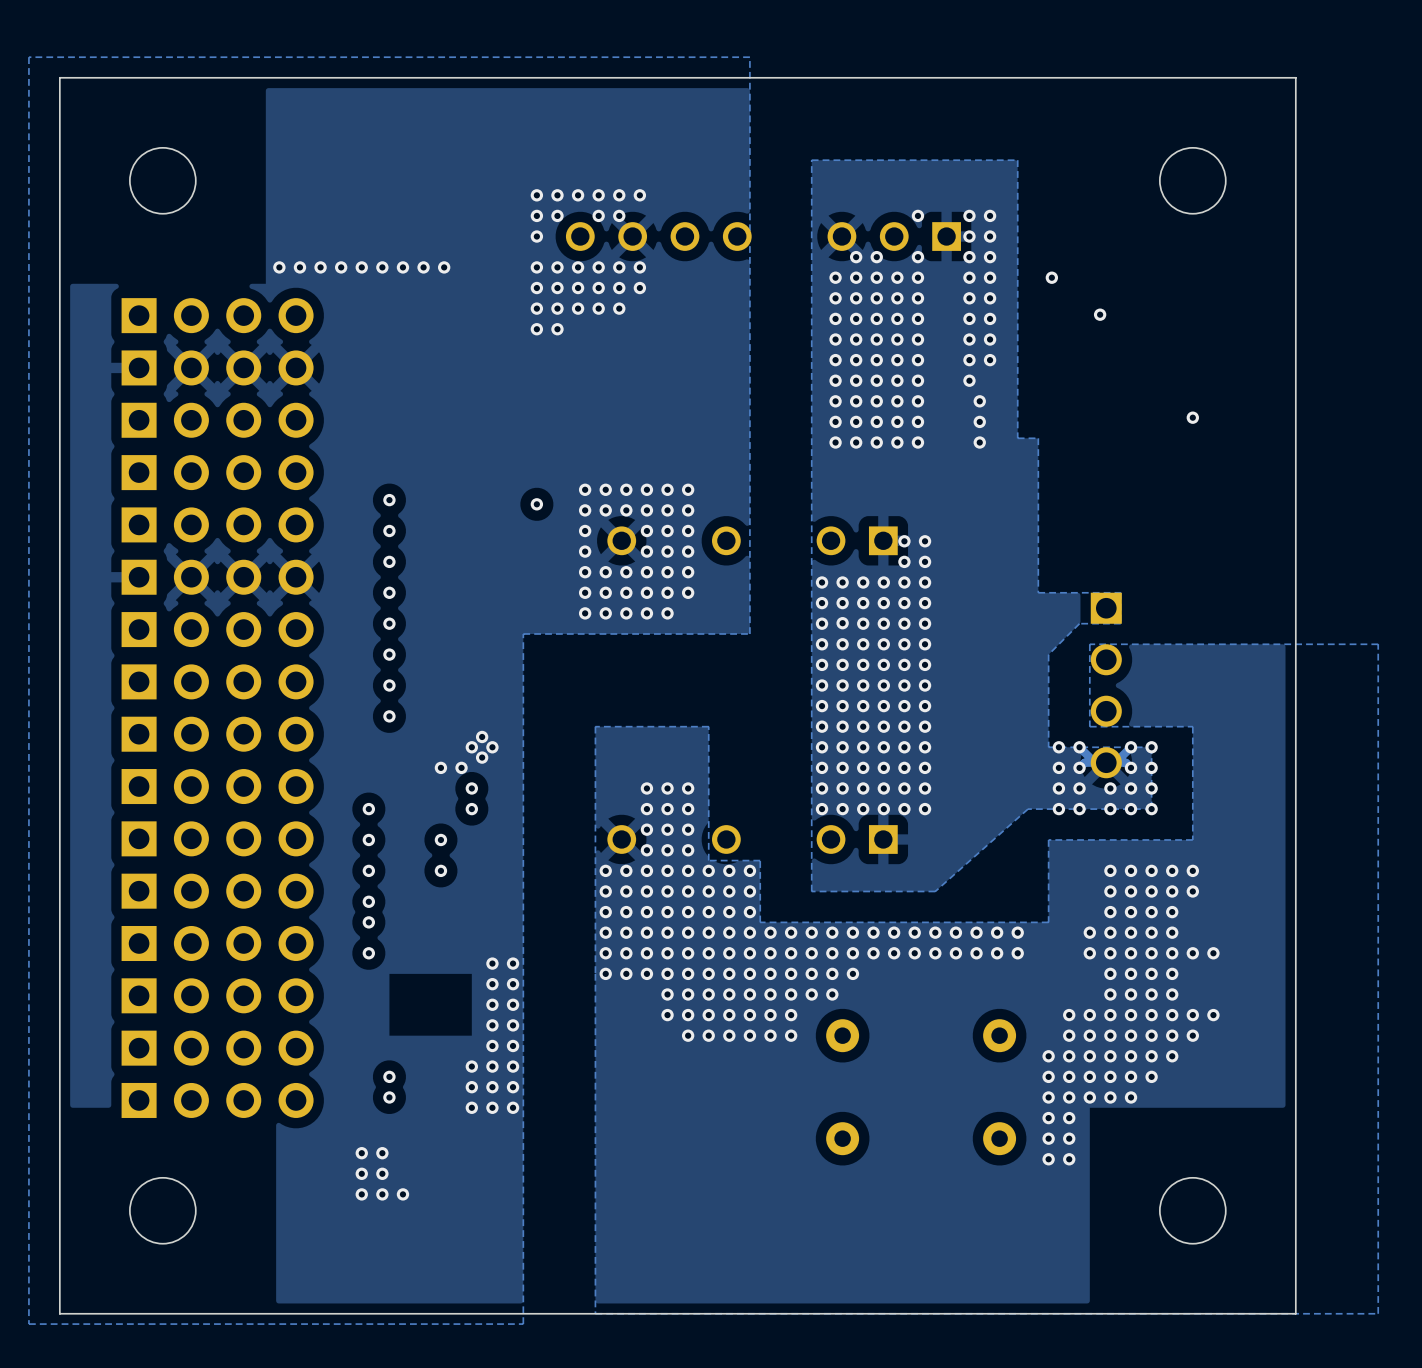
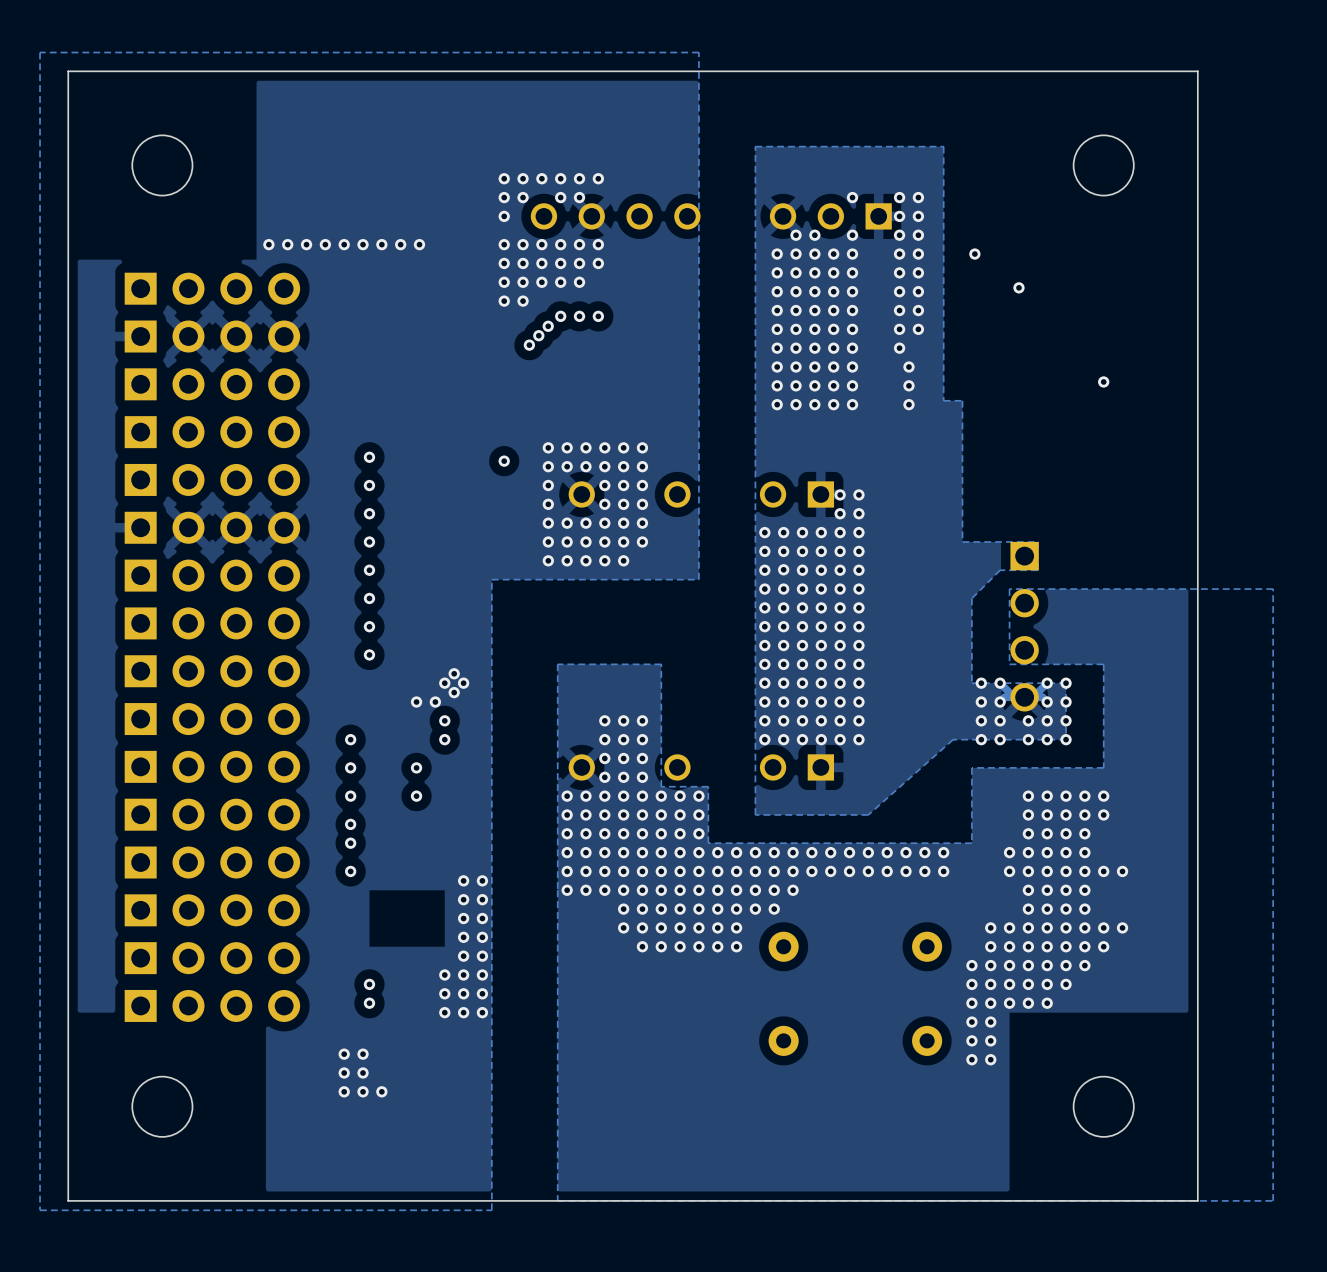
via: none -> (560, 316)
via: none -> (579, 316)
via: none -> (598, 316)
via: none -> (548, 326)
via: none -> (538, 335)
via: none -> (529, 345)

